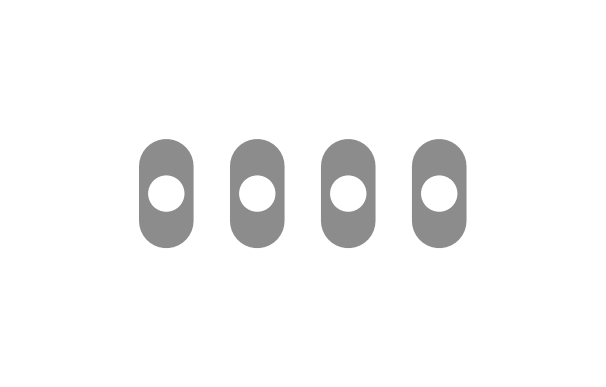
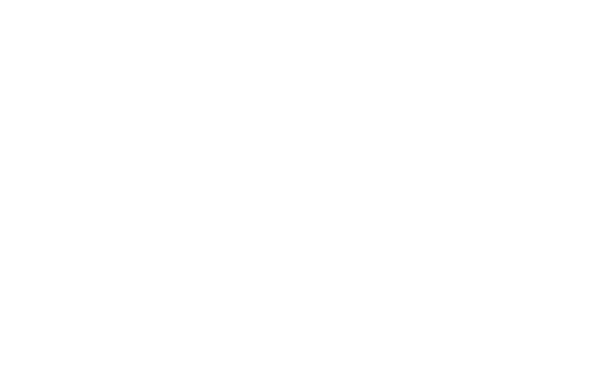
part: (302, 193) -> none

